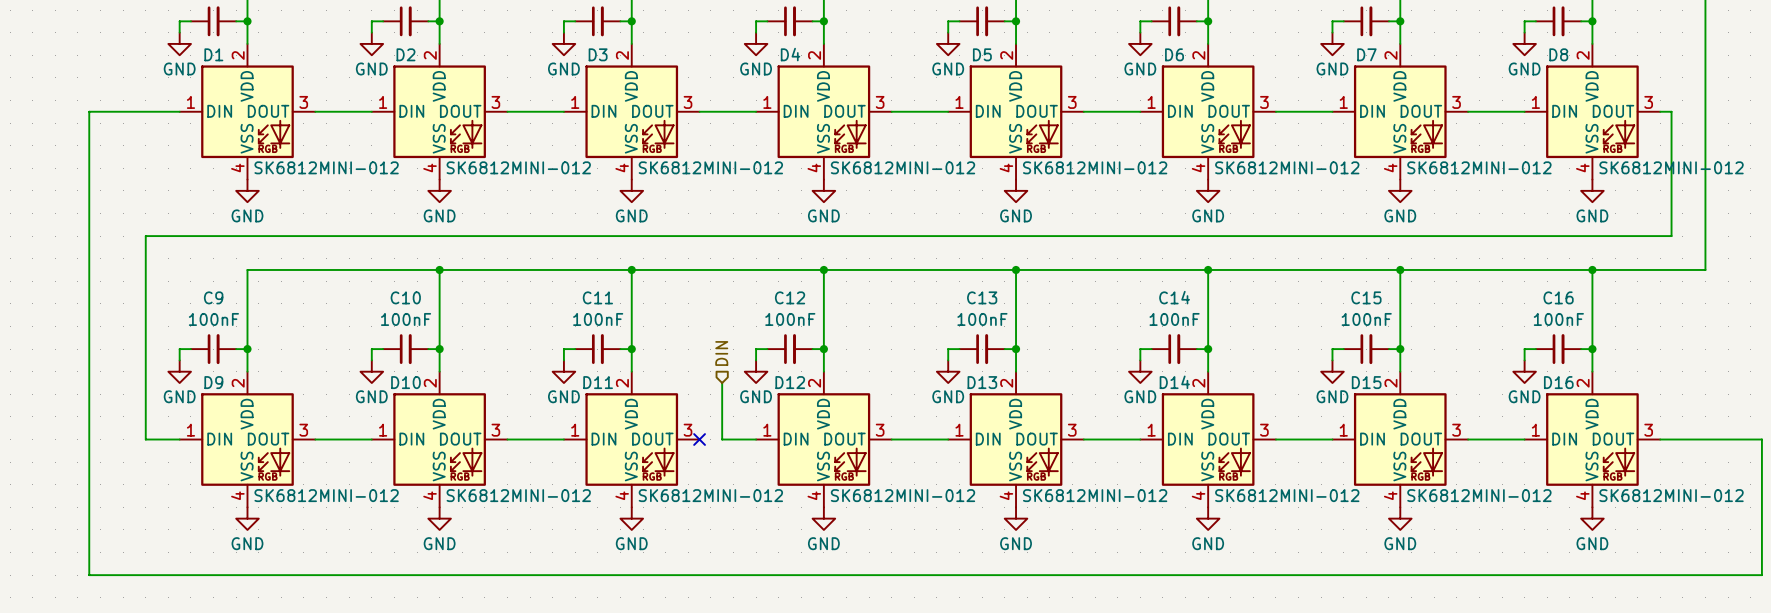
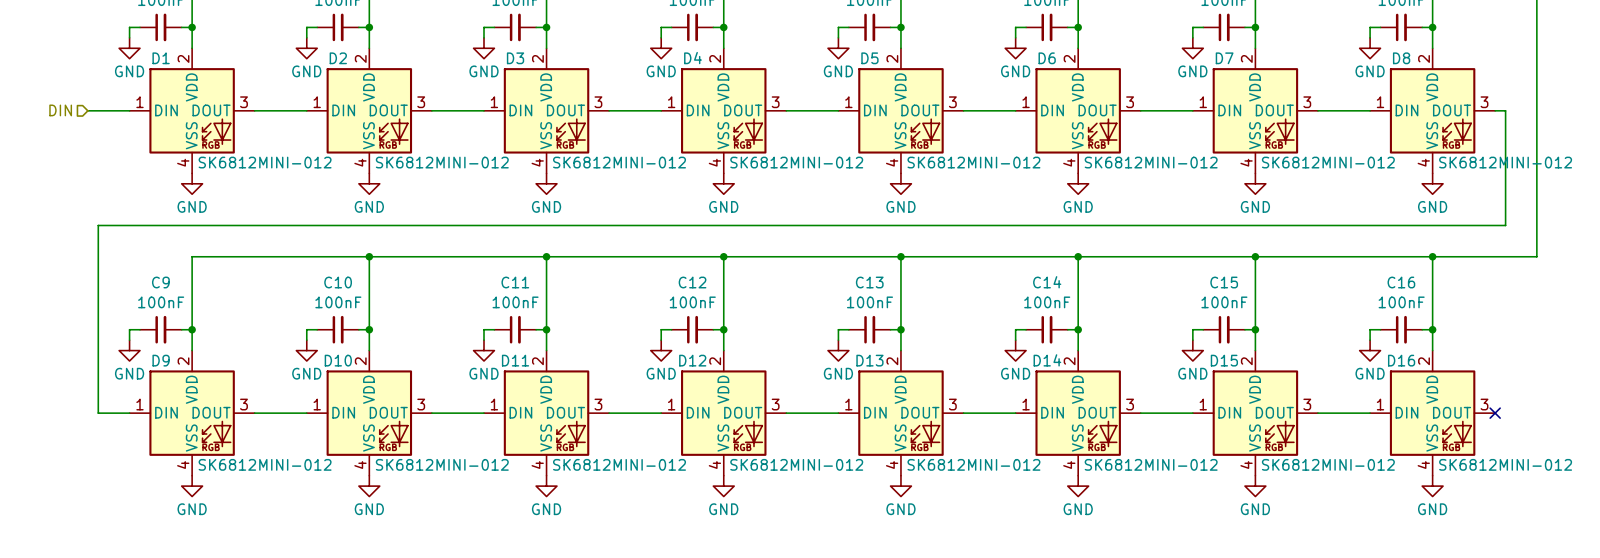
hierarchical label: none -> DIN (60, 110)
wire: (134, 111) (89, 111) (89, 575) (1761, 575) (1761, 439) (1660, 439) -> none
hierarchical label: DIN (721, 353) -> none
wire: (722, 383) (722, 439) -> (609, 413) (629, 413)
no-connect mark: (699, 439) -> none
no-connect mark: none -> (1495, 413)

